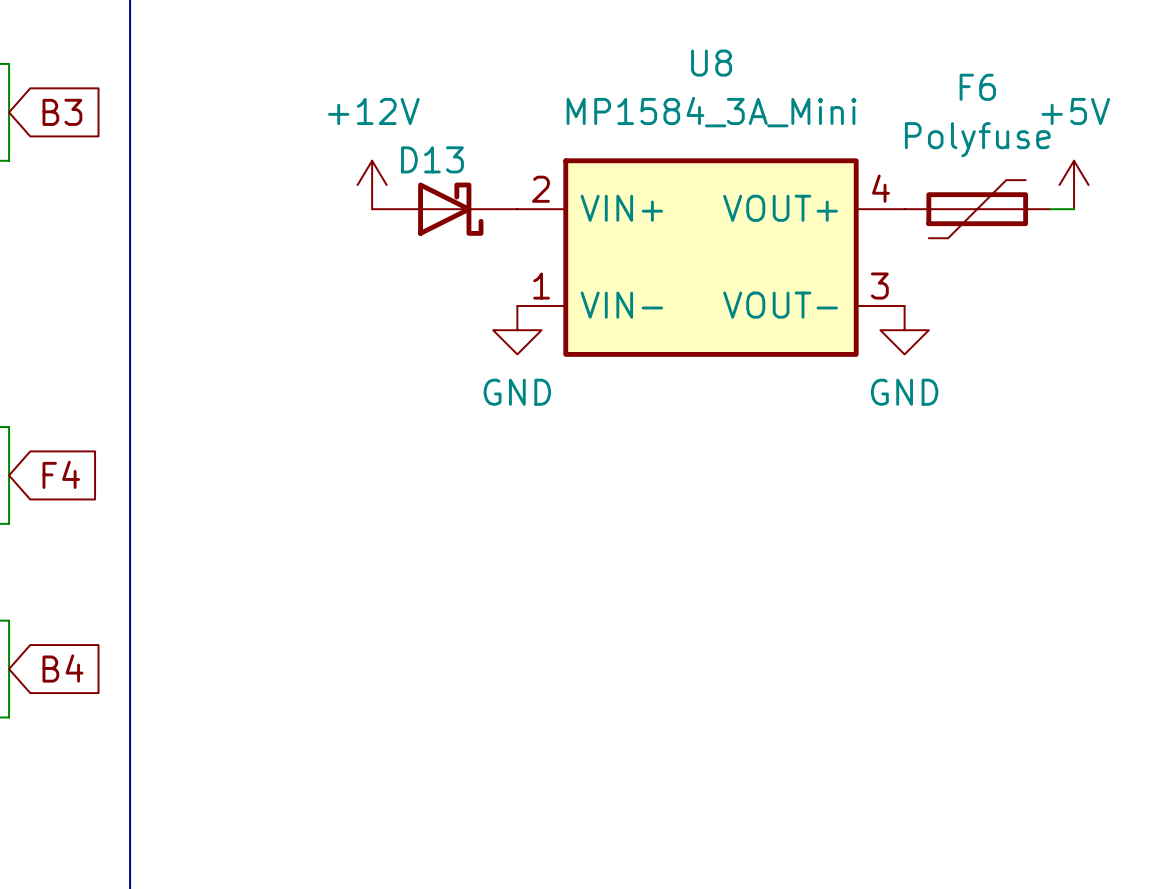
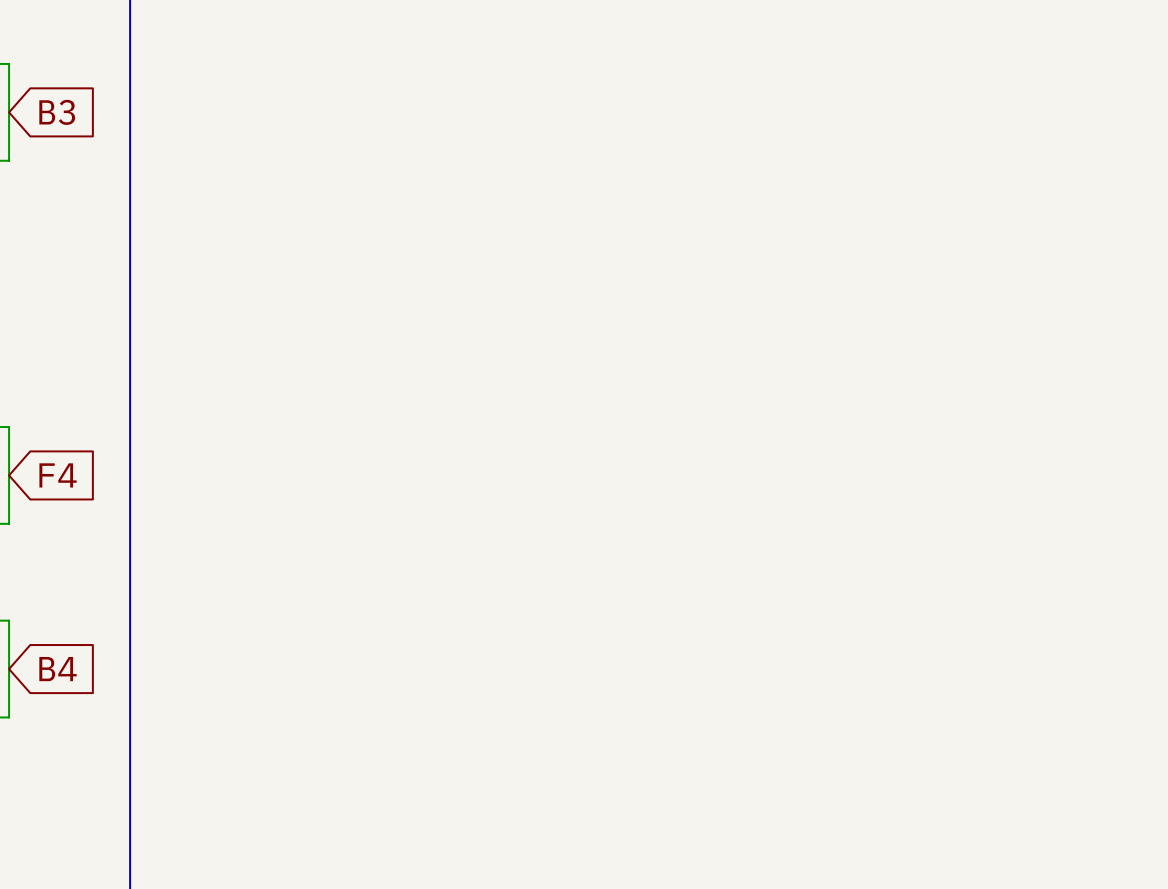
power symbol: +12V (372, 184) -> none
power symbol: +5V (1074, 184) -> none
D13: (444, 209) -> none
F6: Polyfuse (977, 209) -> none
wire: (1049, 209) (1074, 209) -> none
U8: MP1584_3A_Mini (710, 257) -> none
power symbol: GND (517, 330) -> none
power symbol: GND (904, 330) -> none

